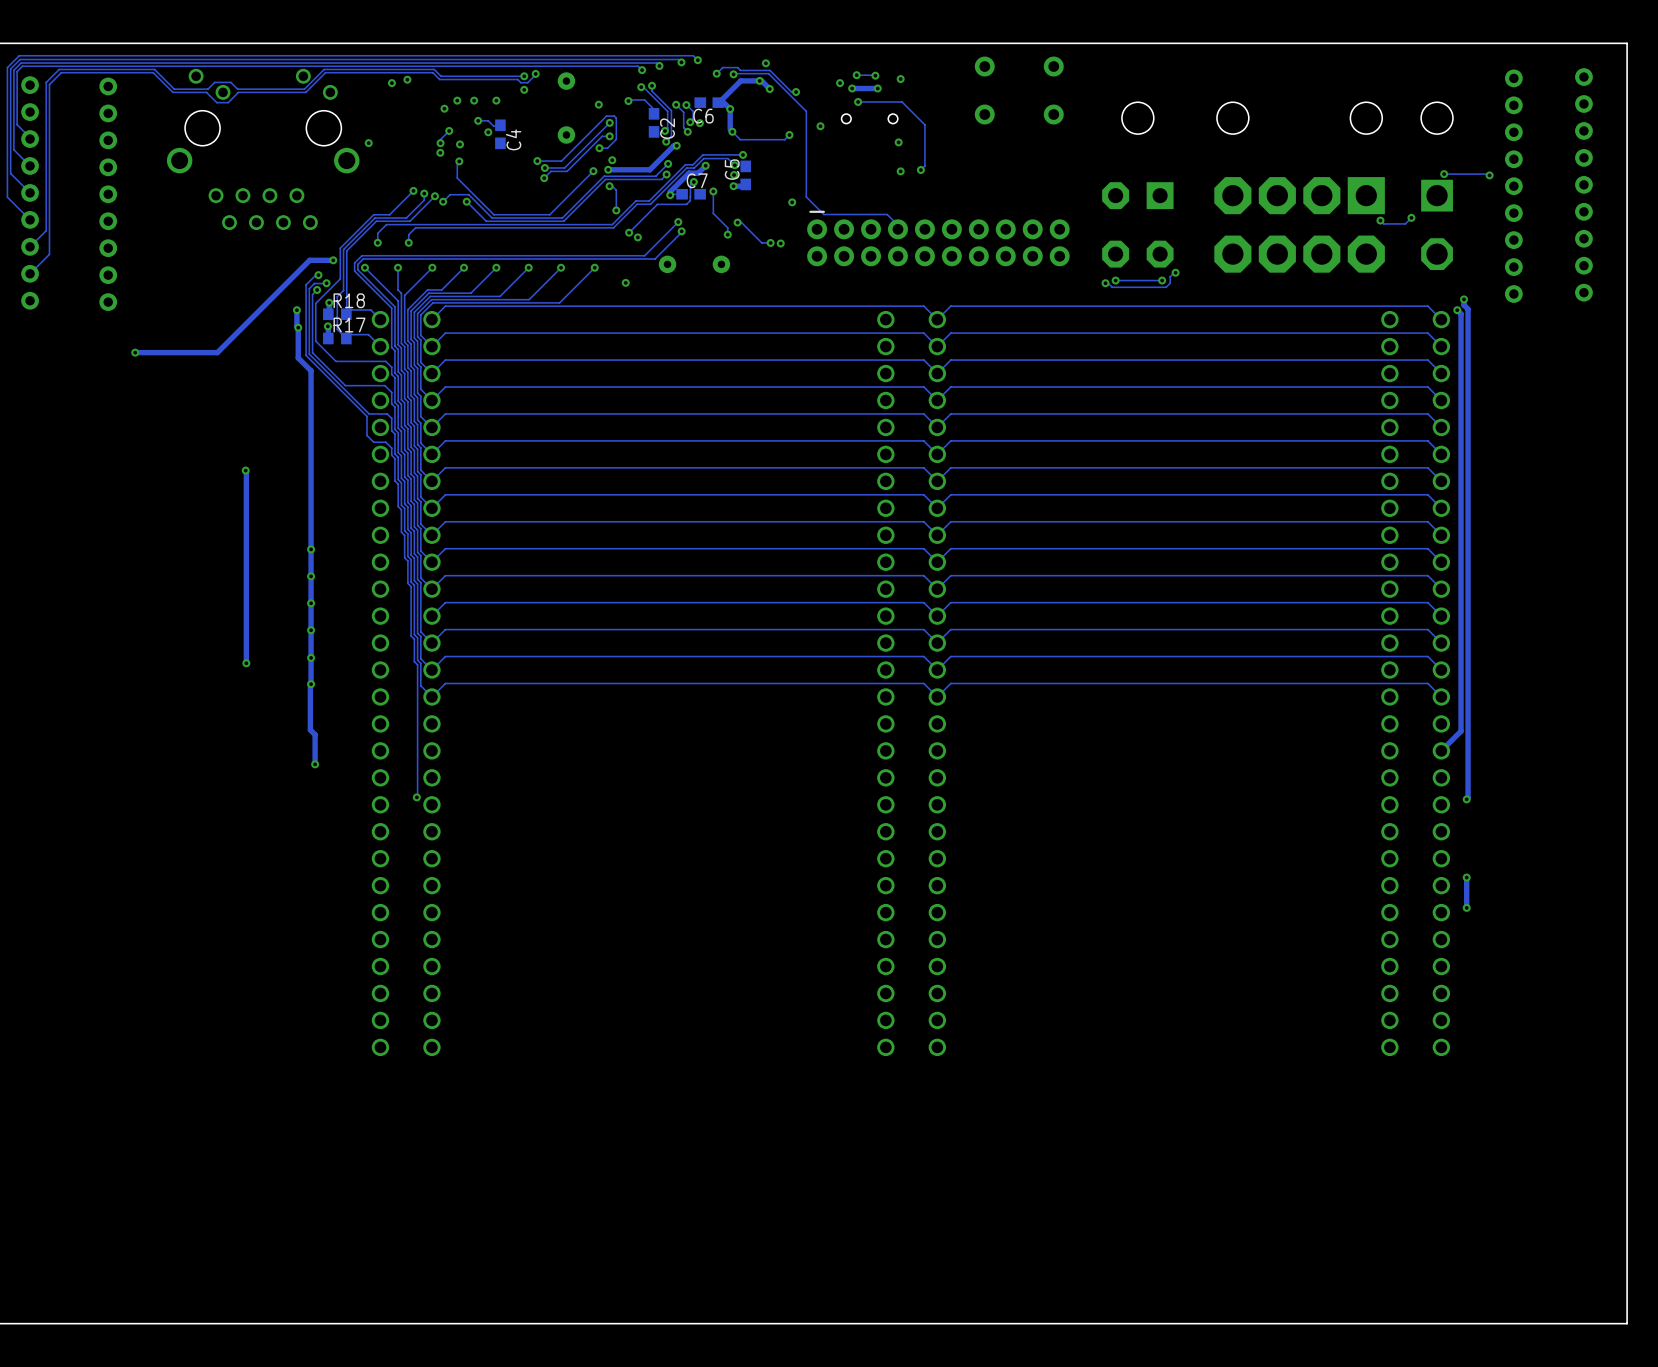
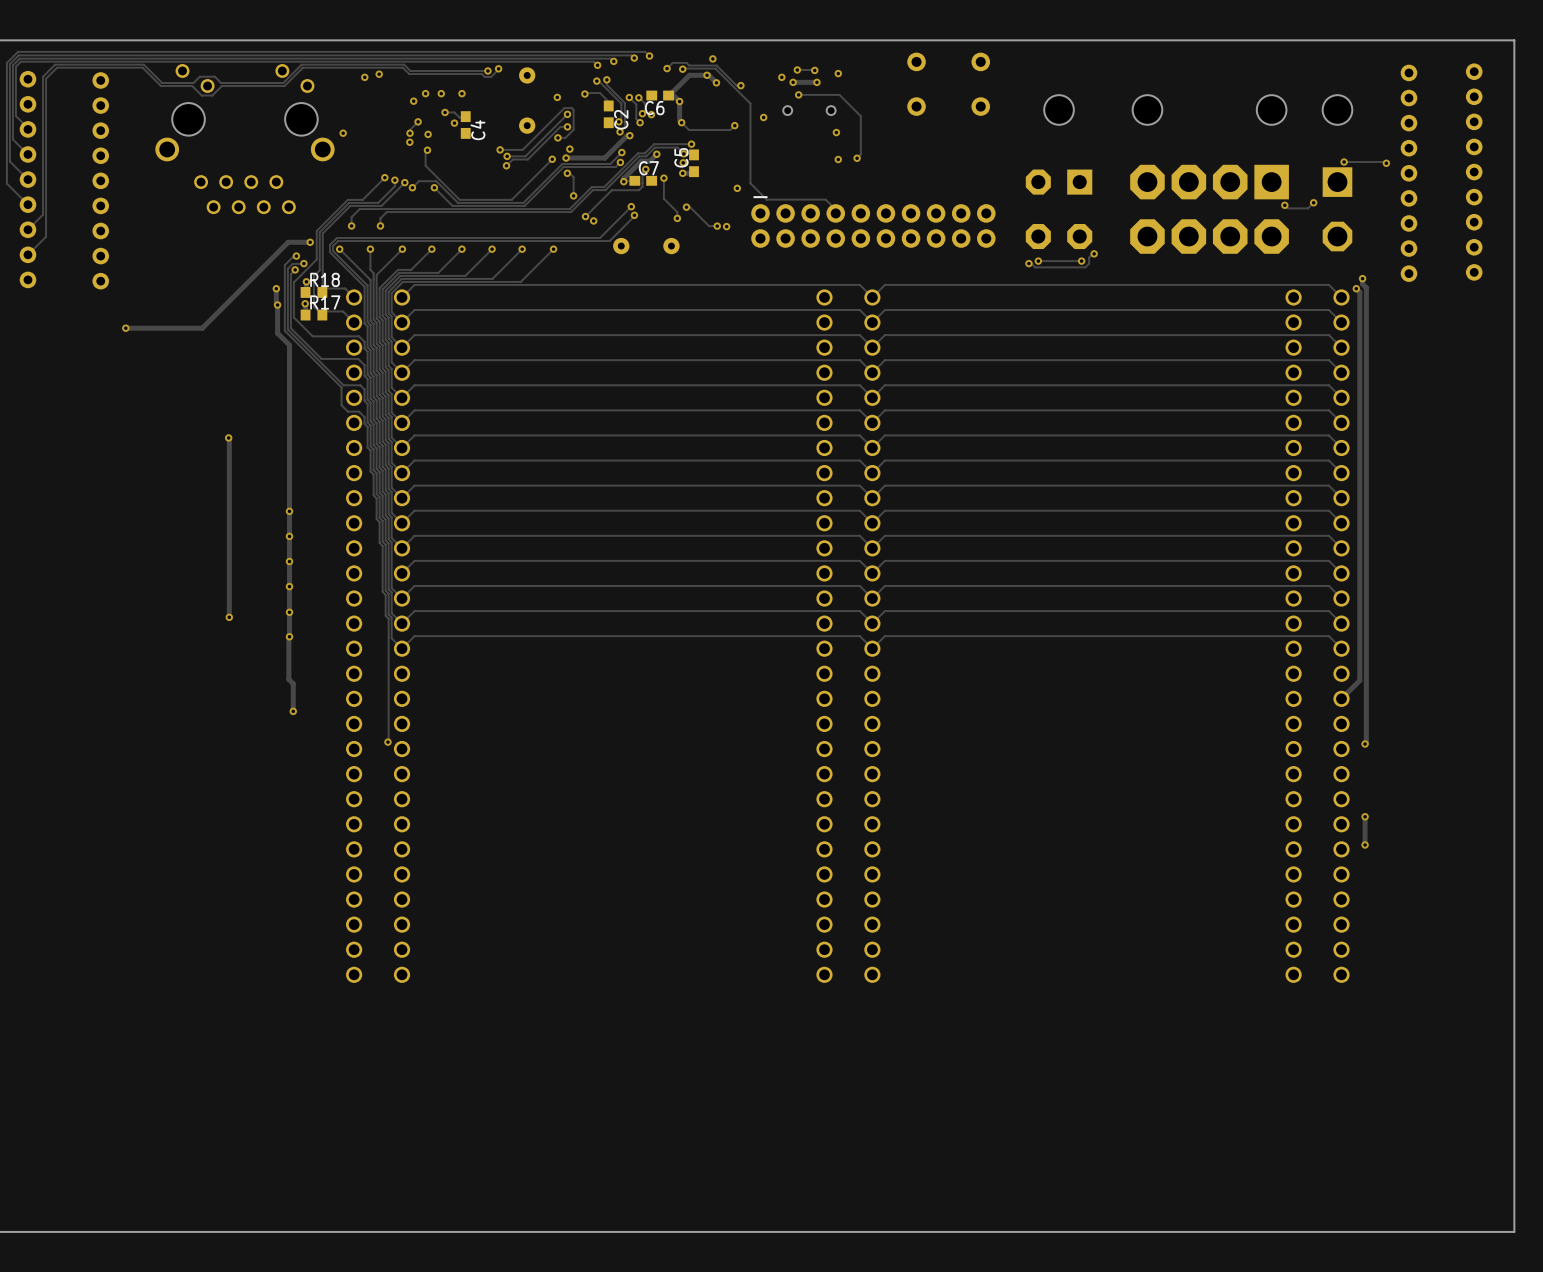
via: (524, 89) -> none
via: (625, 282) -> none

